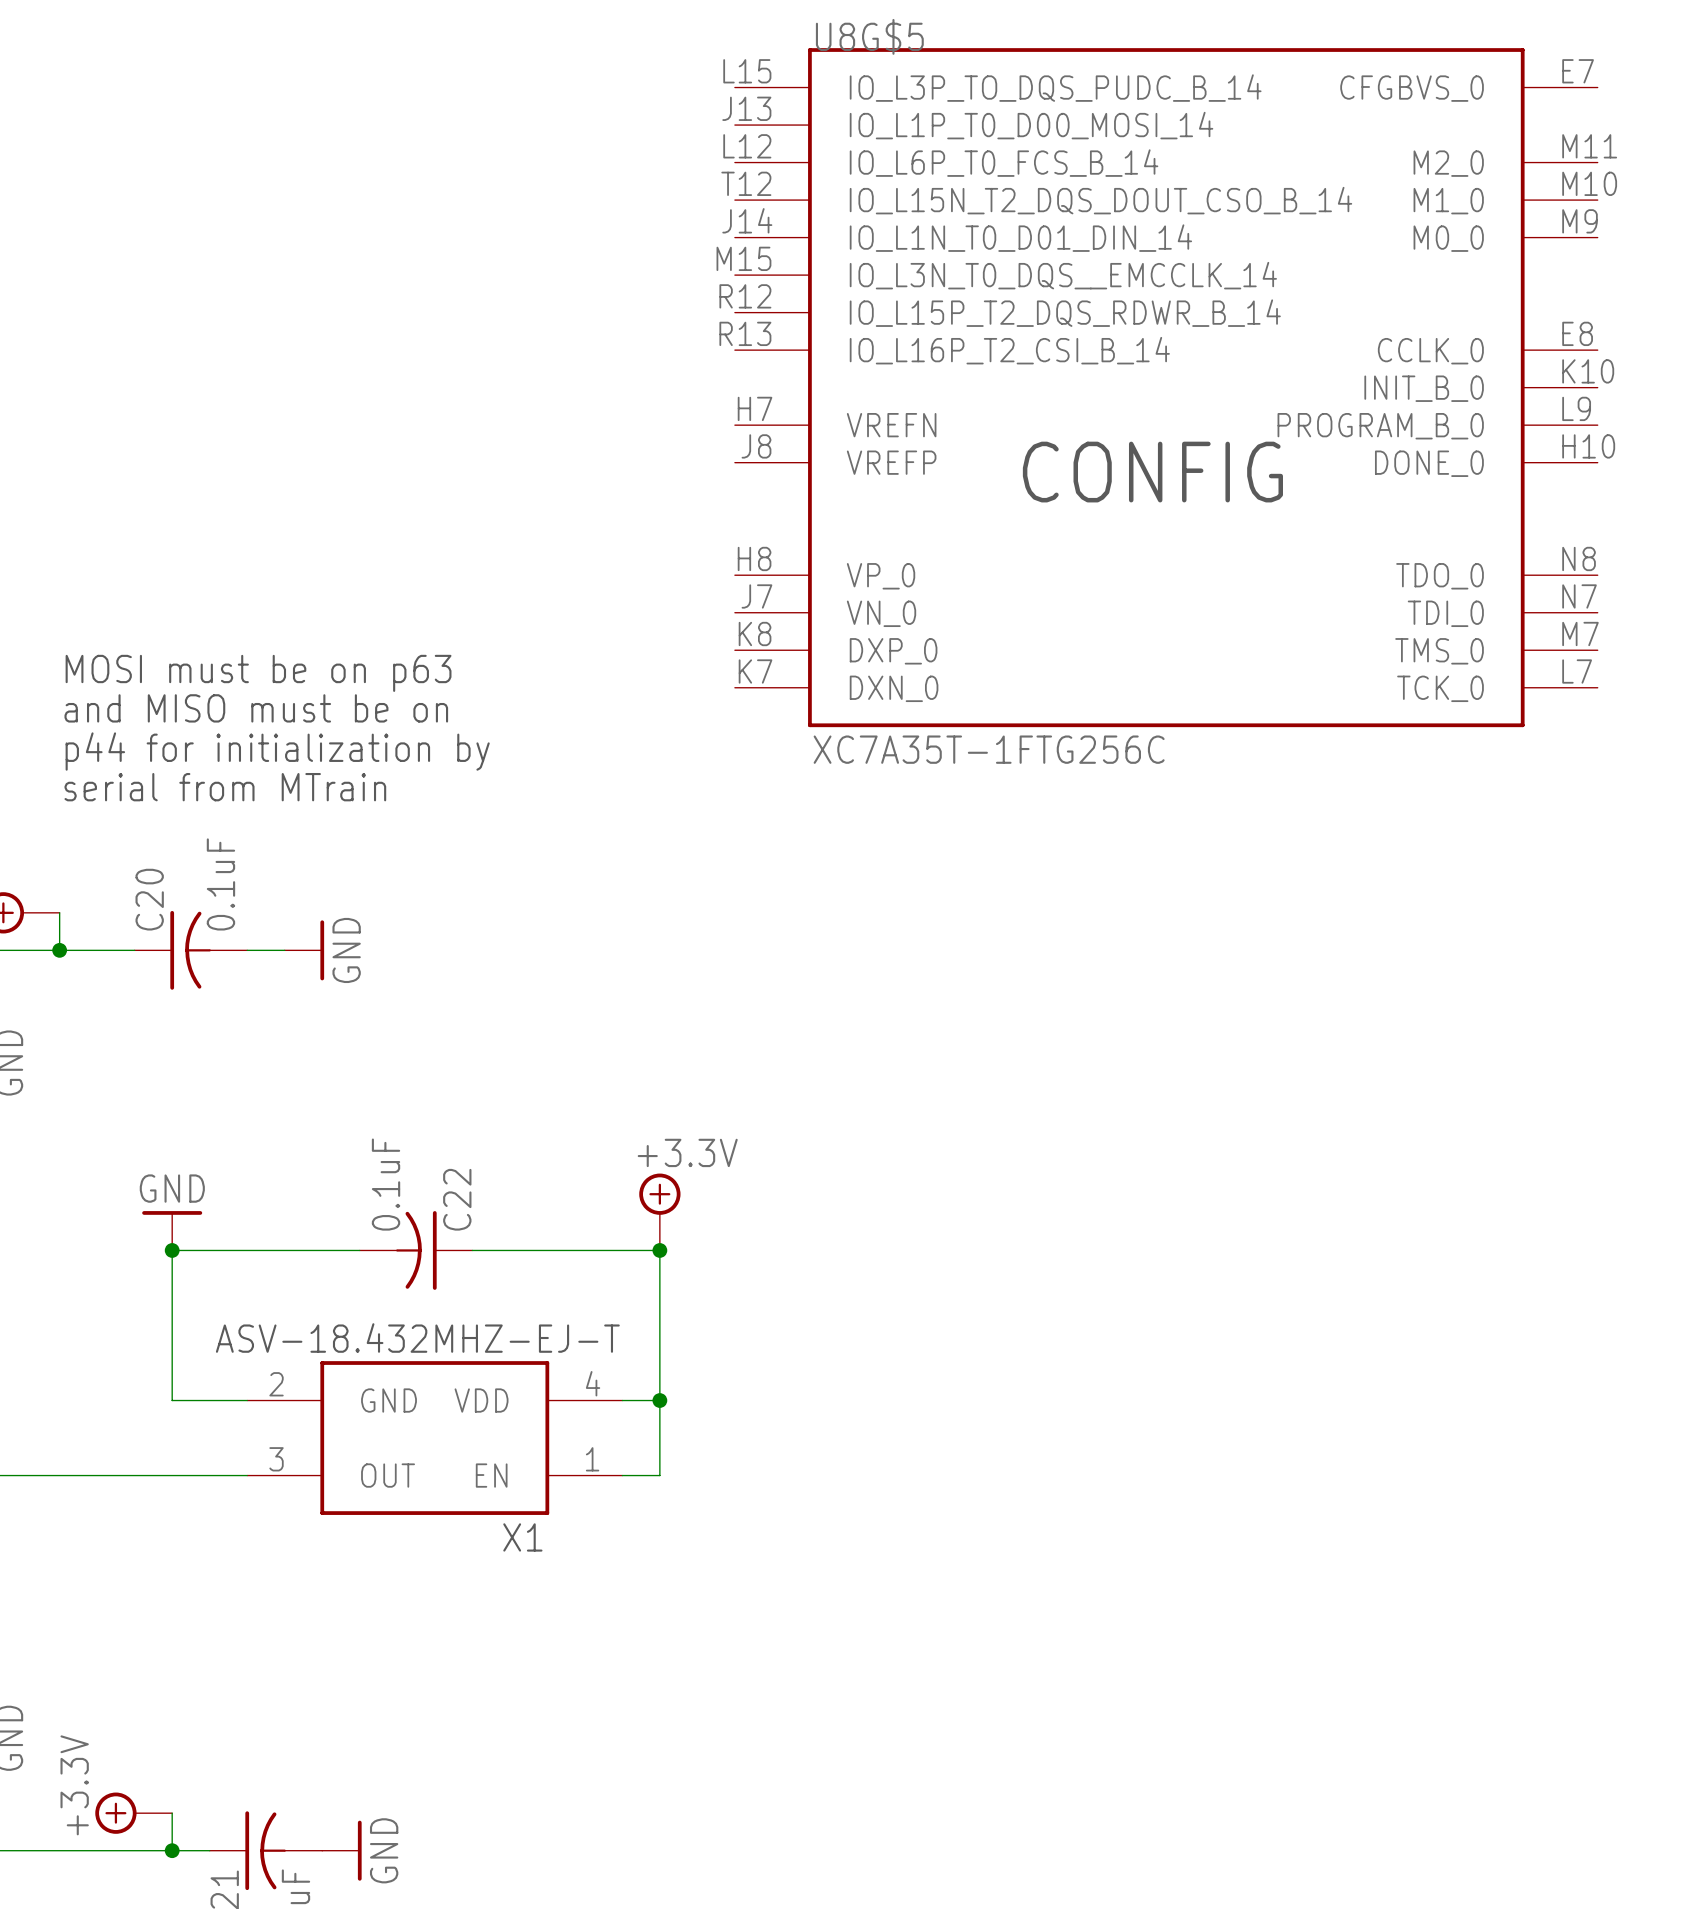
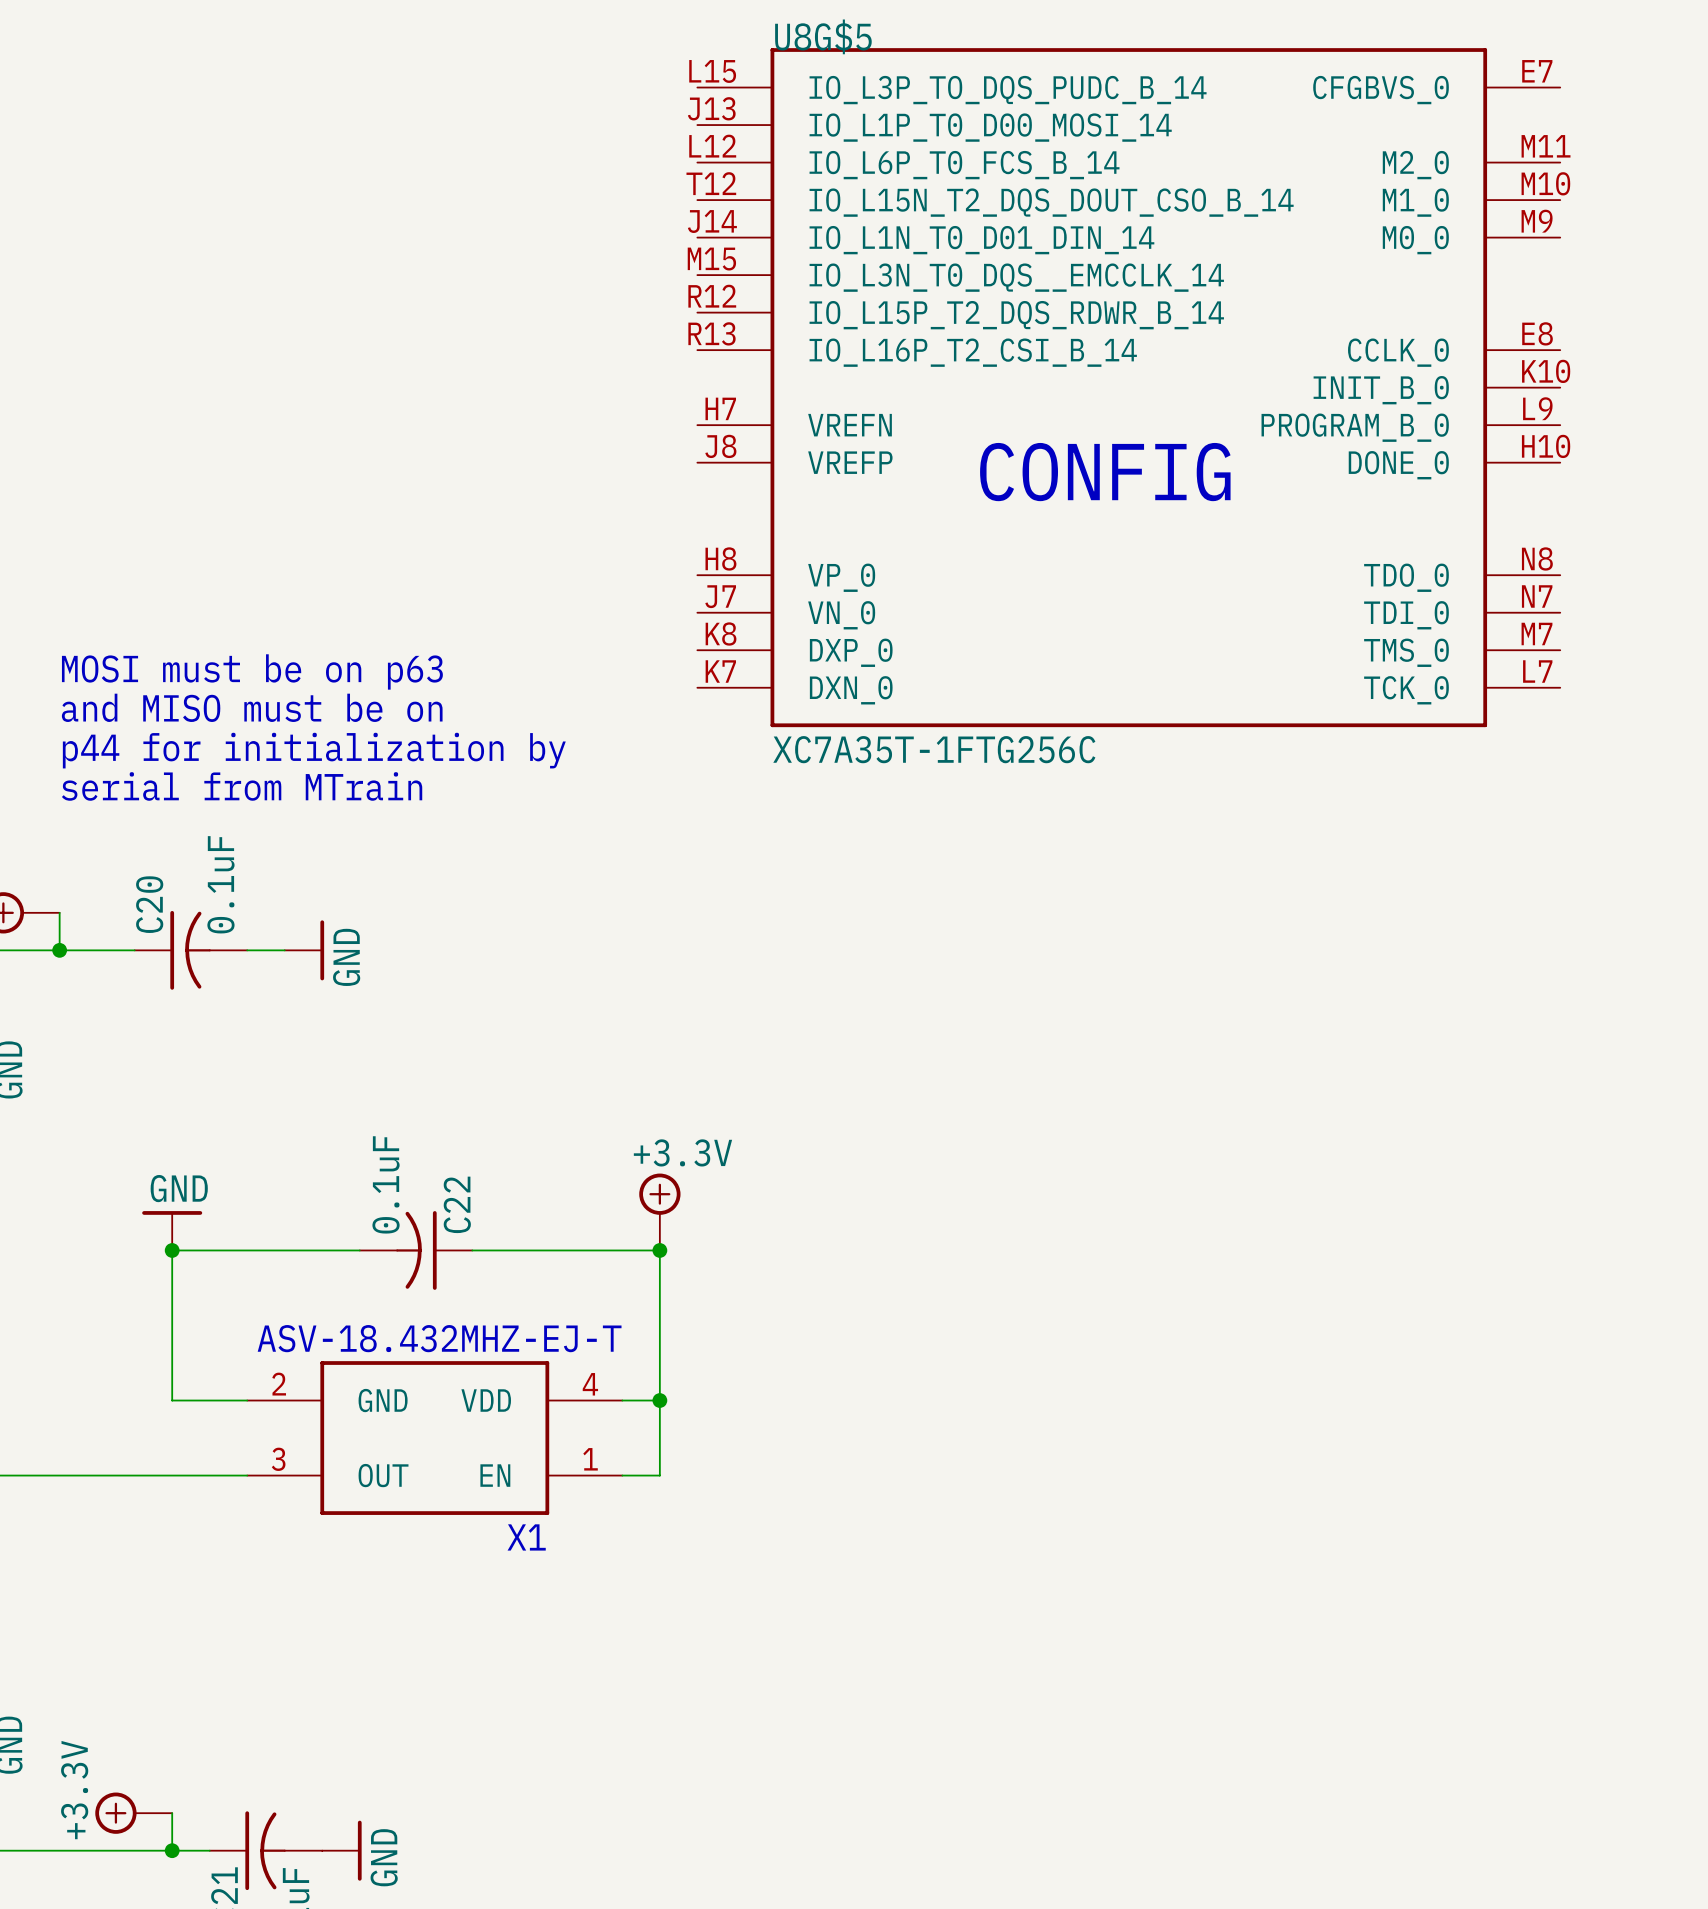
U8G$5 position: (1166, 387) -> (1128, 387)

